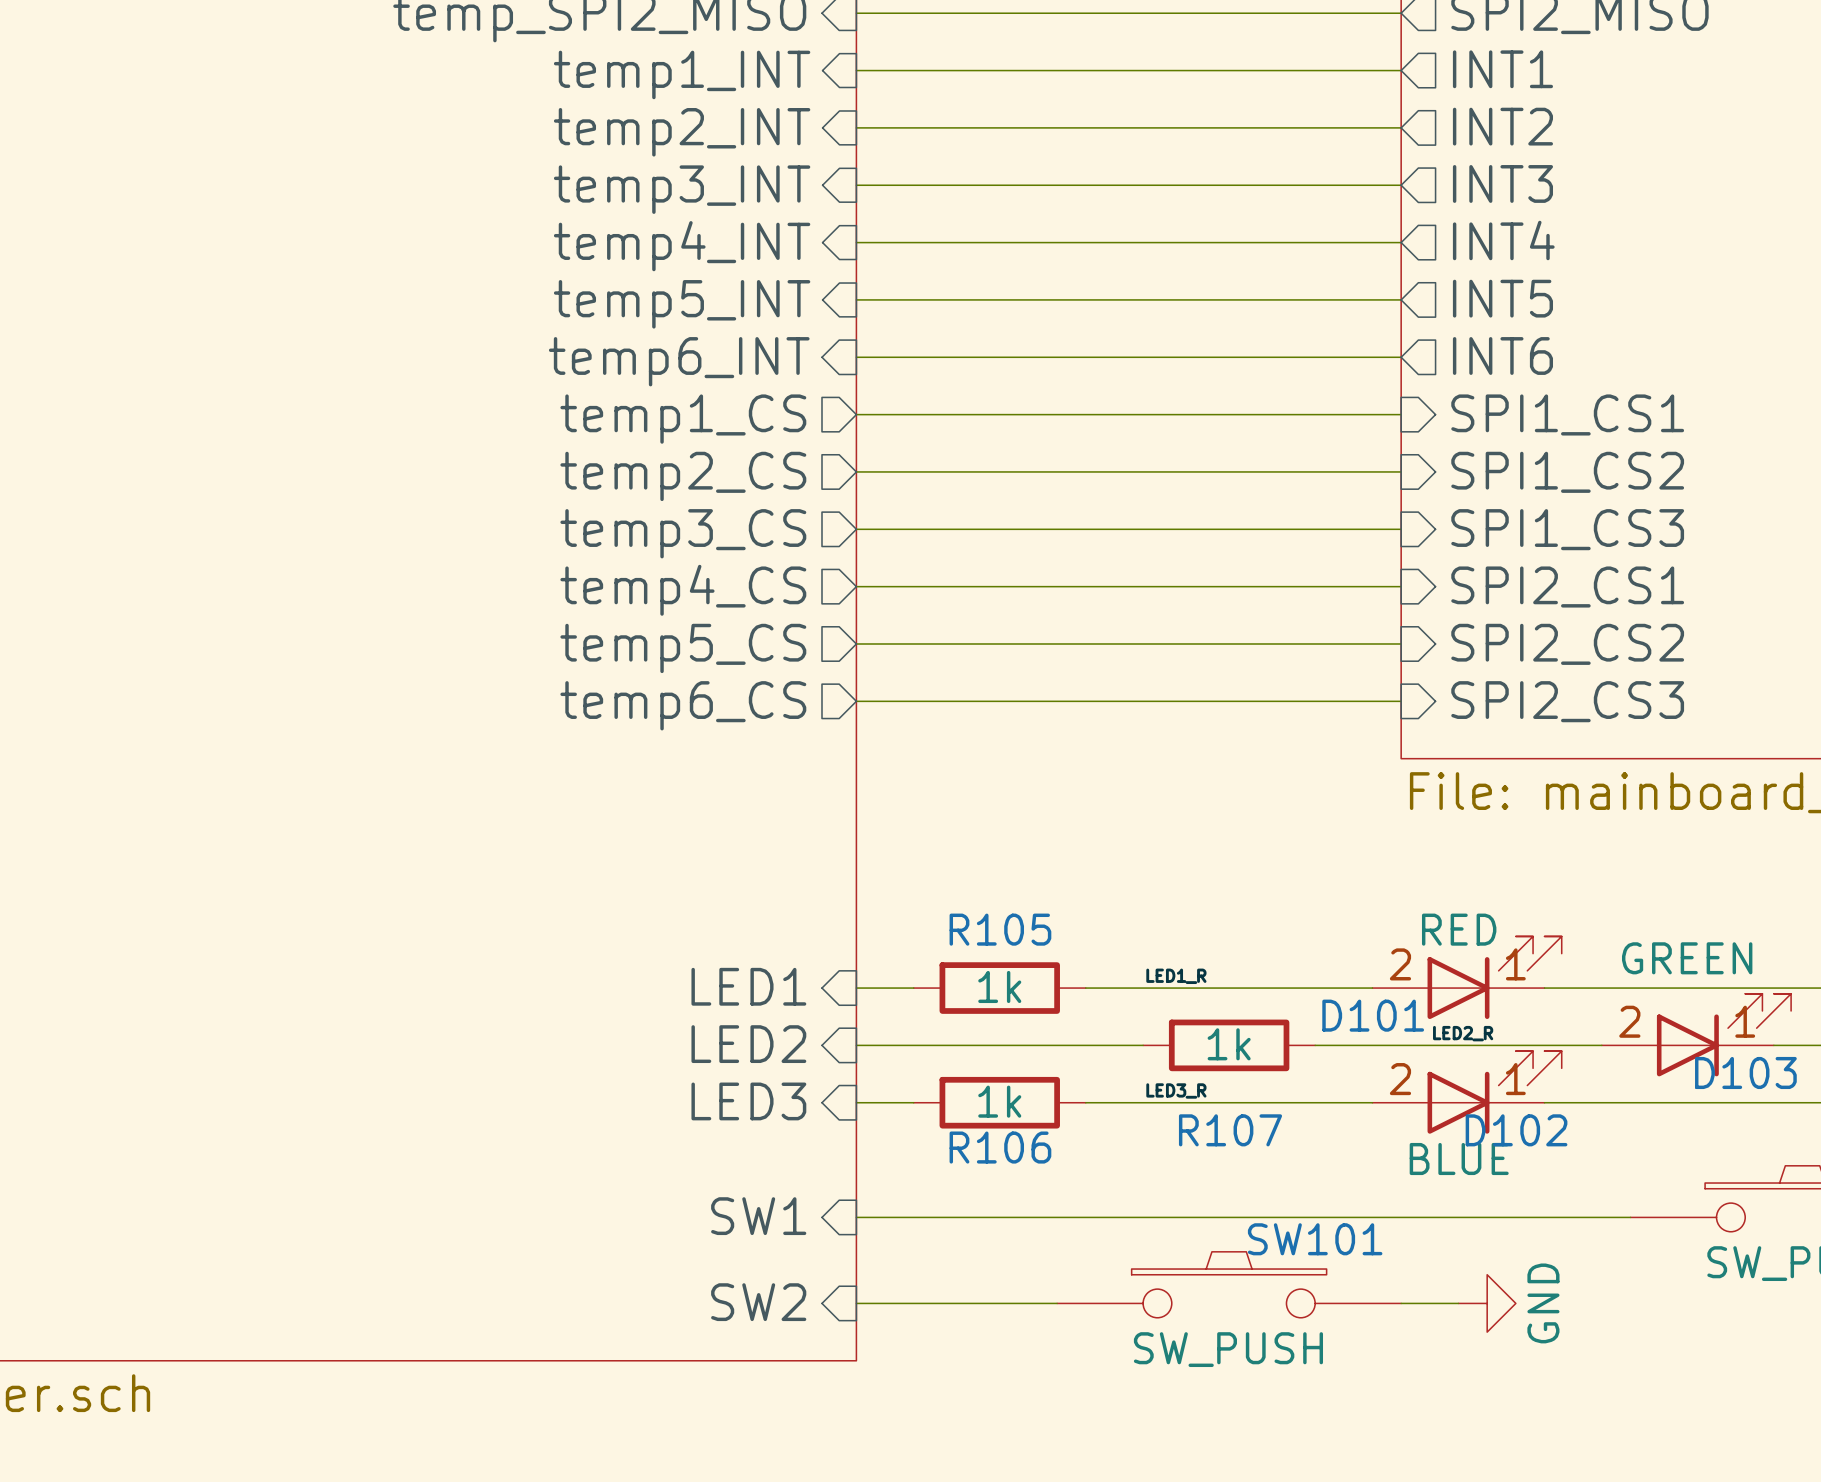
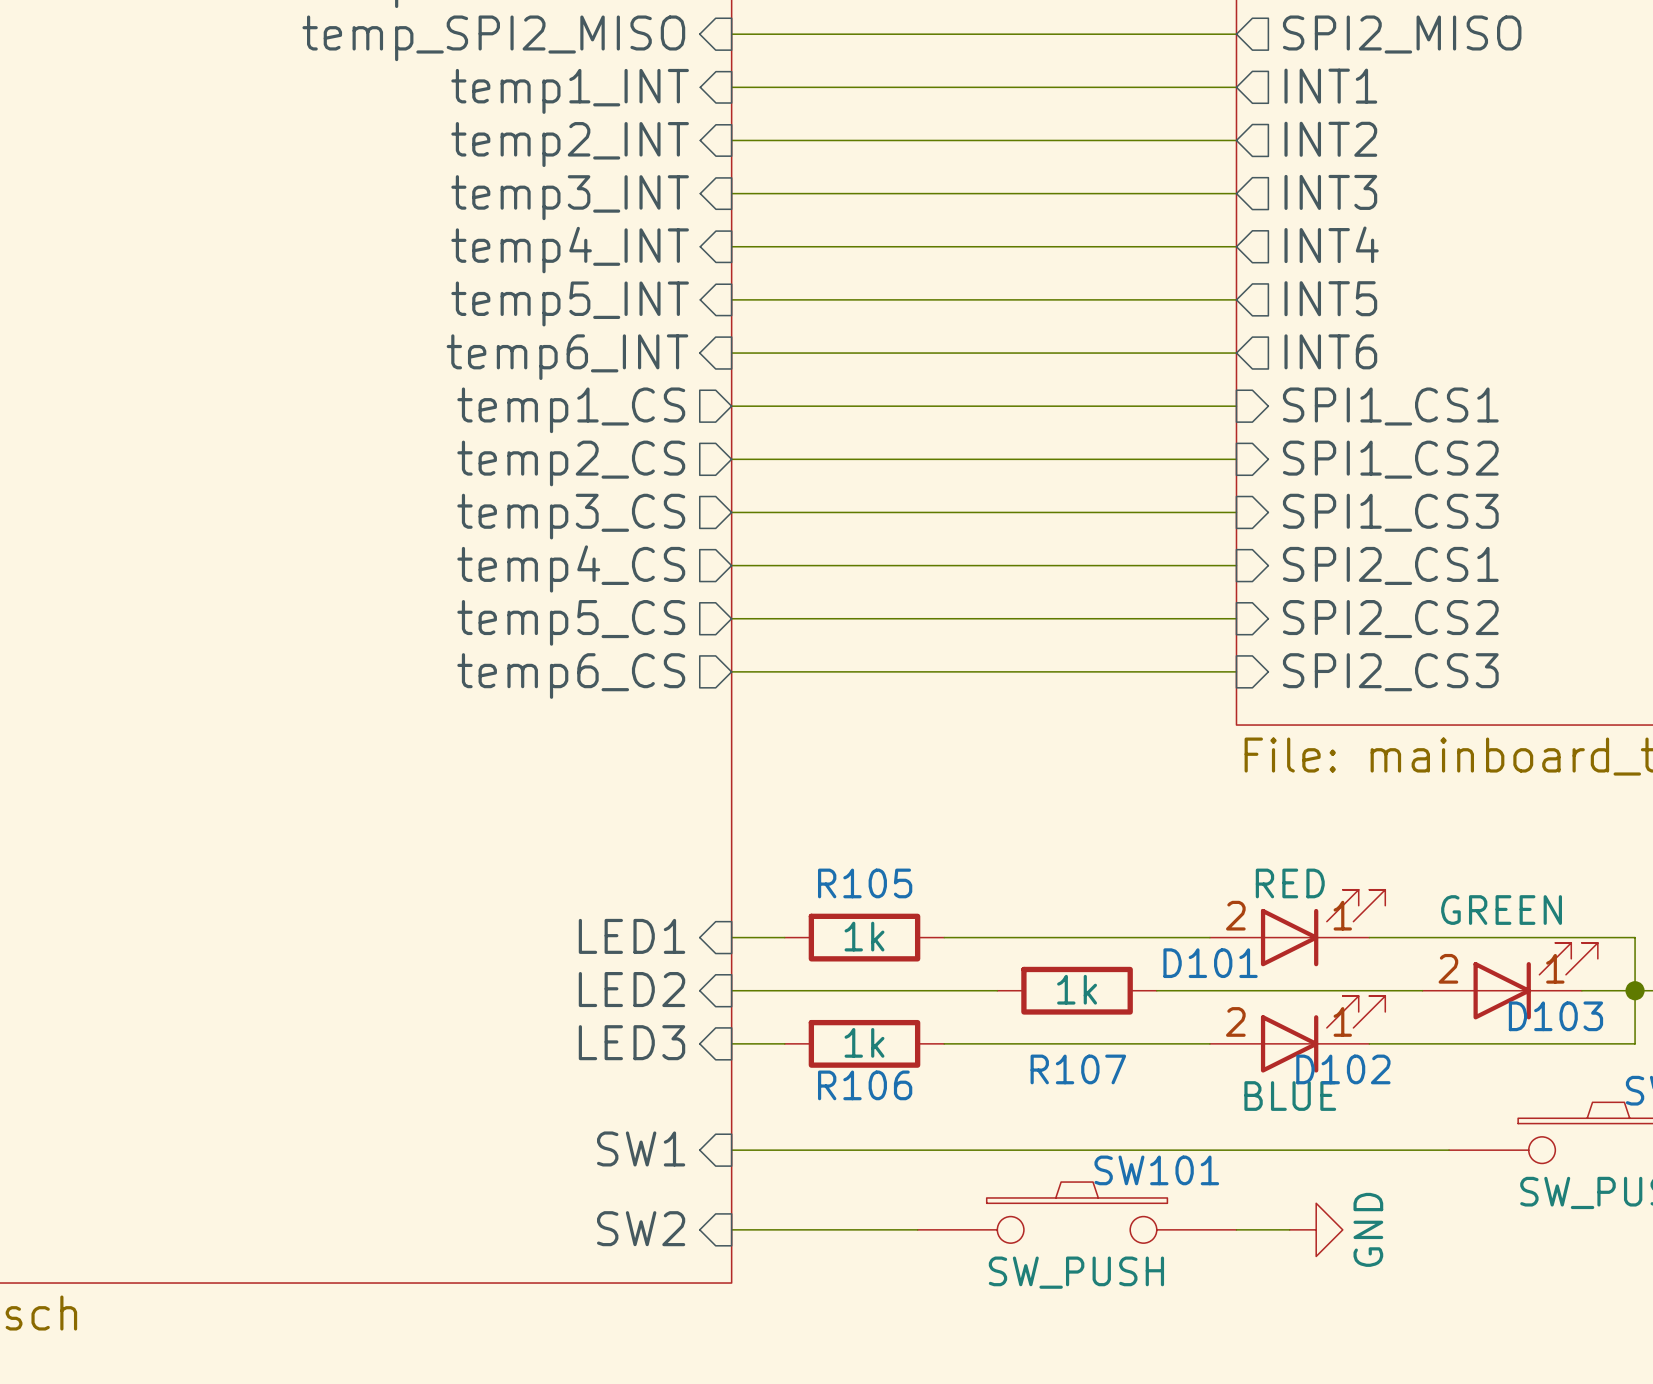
label: LED1_R (1176, 976) -> none
label: LED2_R (1463, 1033) -> none
label: LED3_R (1176, 1090) -> none

